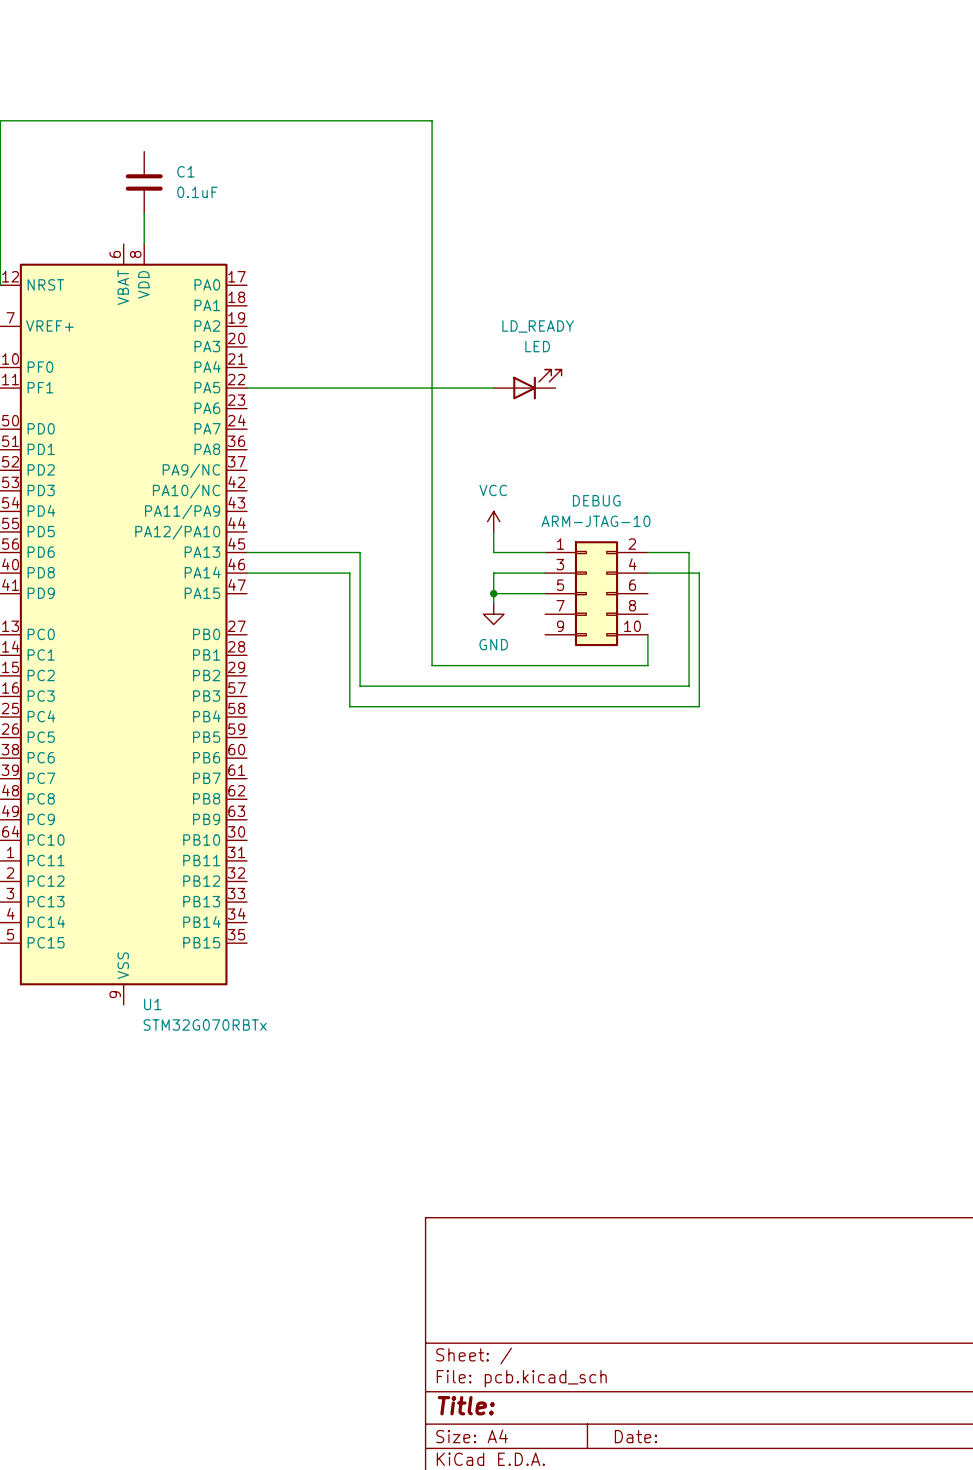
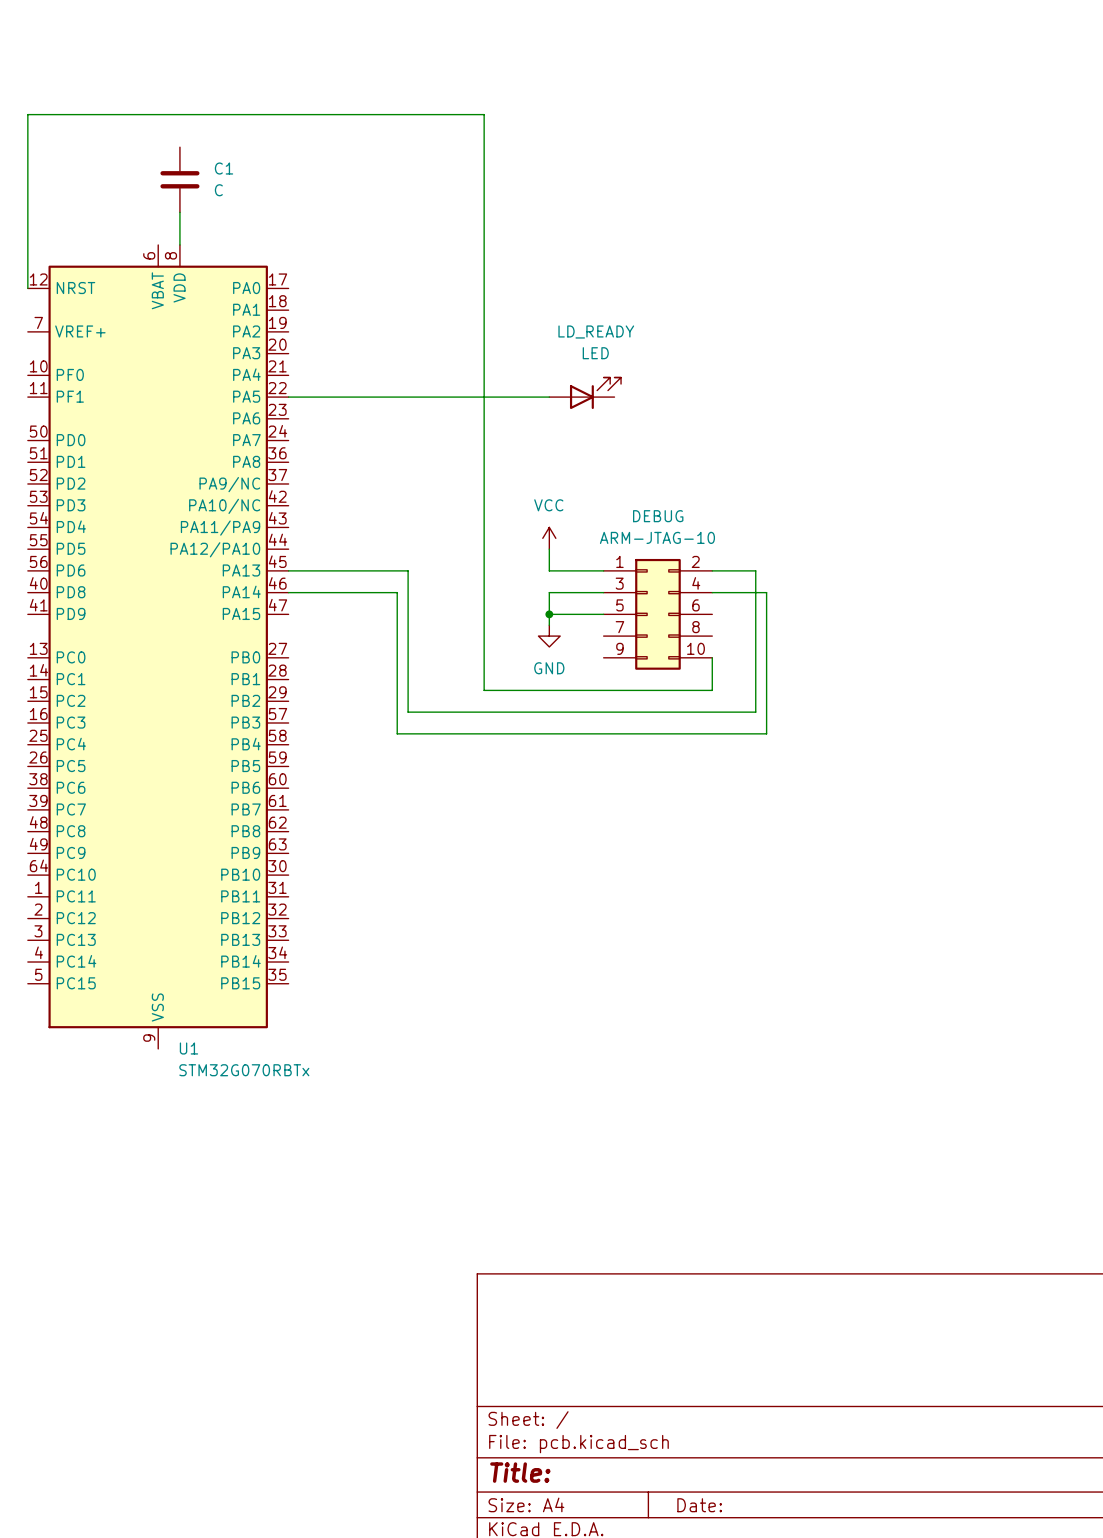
C1 value: 0.1uF (197, 192) -> C (218, 190)

